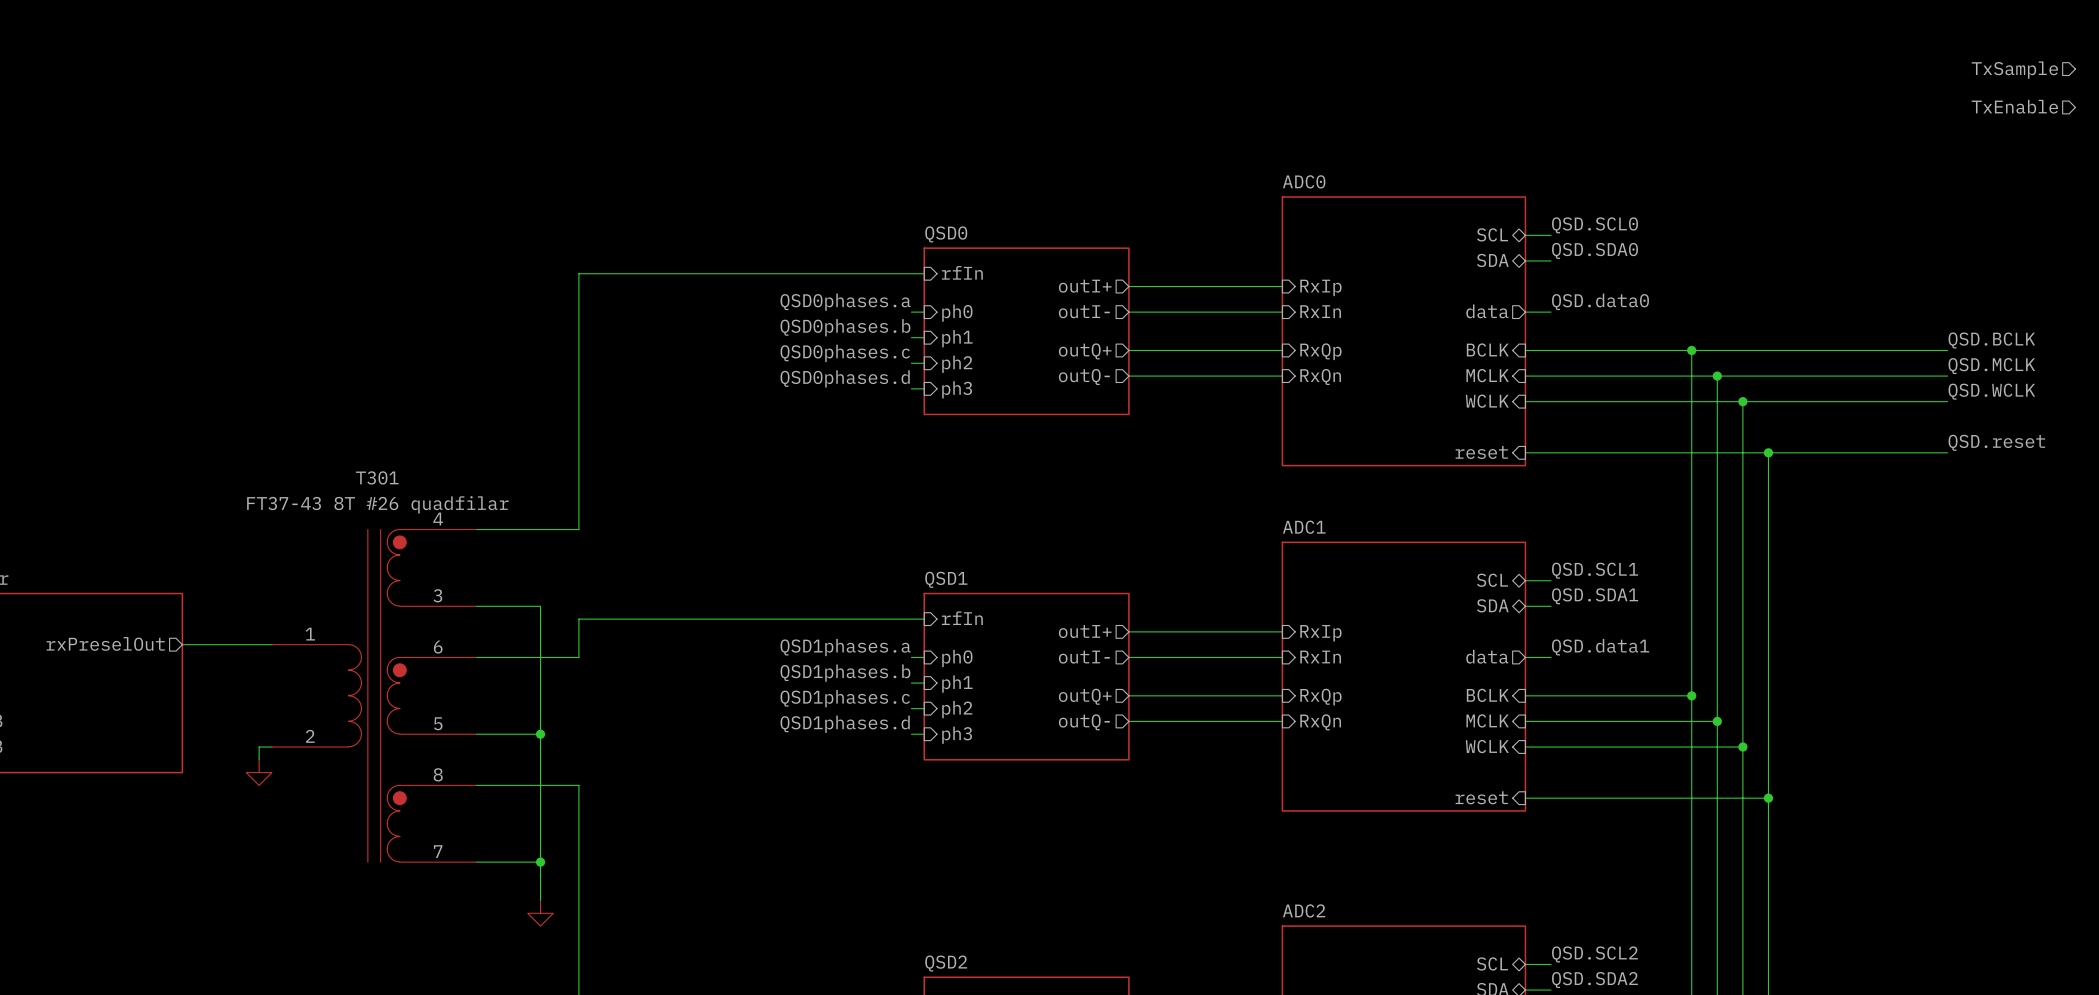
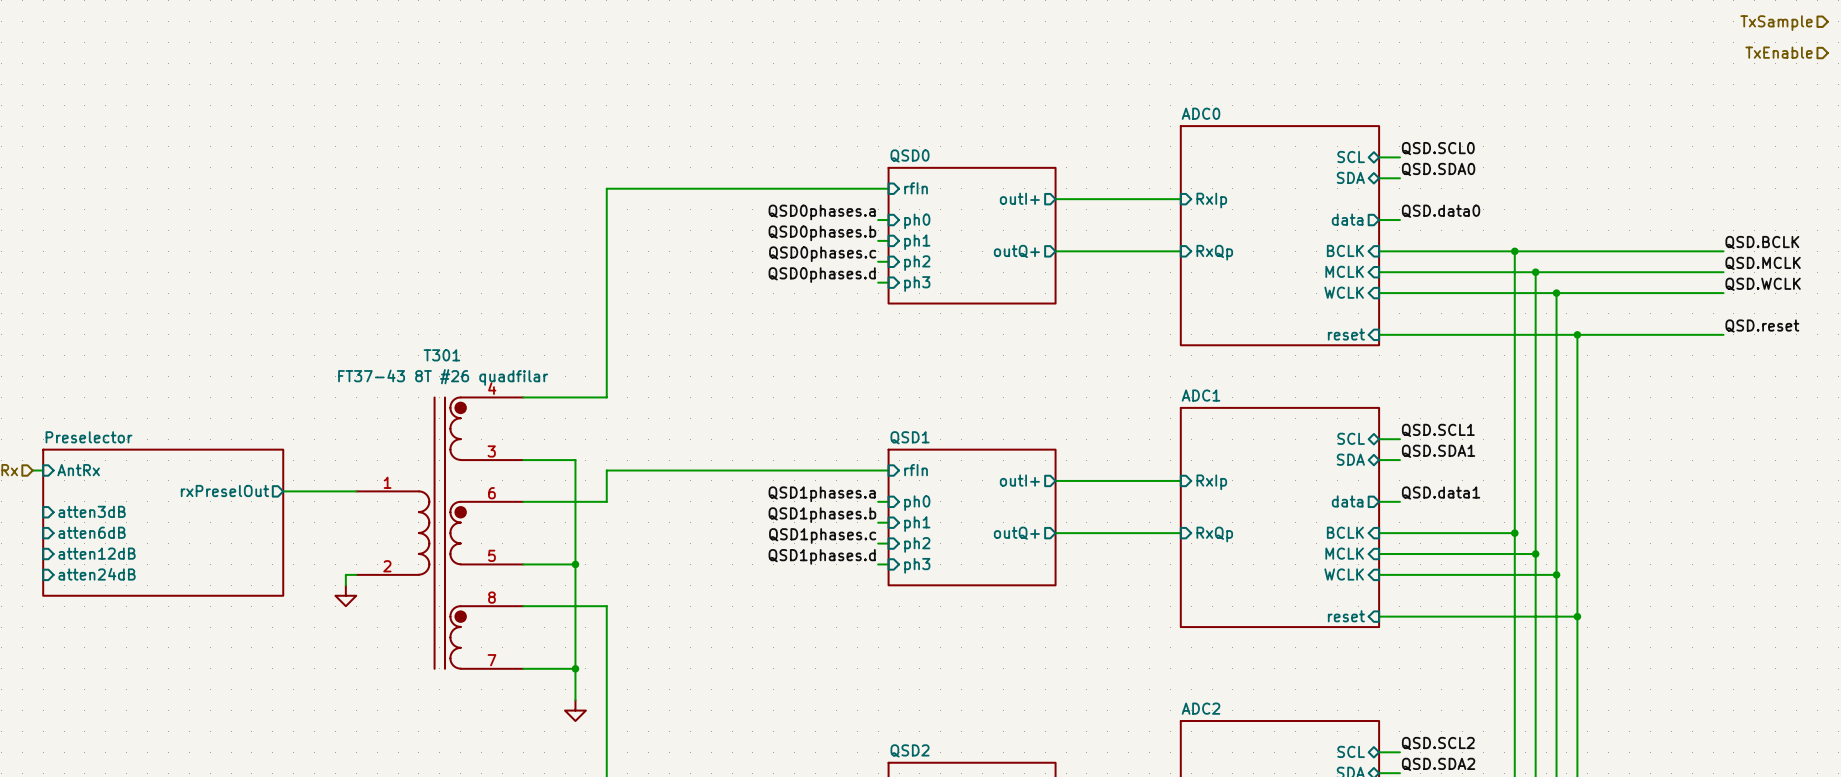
sheet pin: outI- (1084, 311) -> none
sheet pin: RxIn (1320, 311) -> none
wire: (1128, 312) (1282, 312) -> none
sheet pin: outQ- (1084, 376) -> none
wire: (1128, 376) (1282, 376) -> none
sheet pin: RxQn (1320, 376) -> none
sheet pin: outI- (1084, 657) -> none
wire: (1128, 657) (1282, 657) -> none
sheet pin: RxIn (1320, 657) -> none
wire: (1128, 721) (1282, 721) -> none
sheet pin: outQ- (1084, 722) -> none
sheet pin: RxQn (1320, 722) -> none

